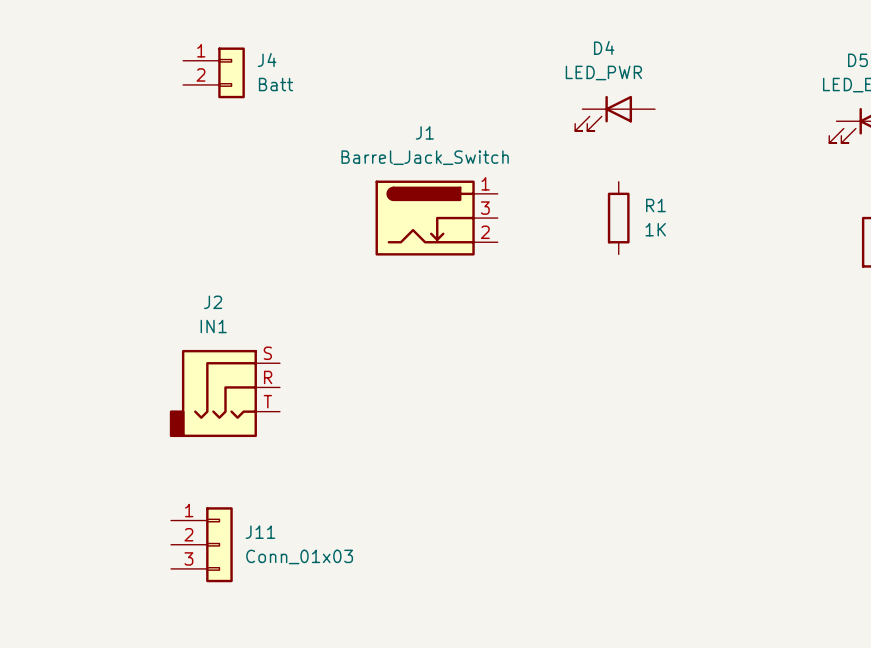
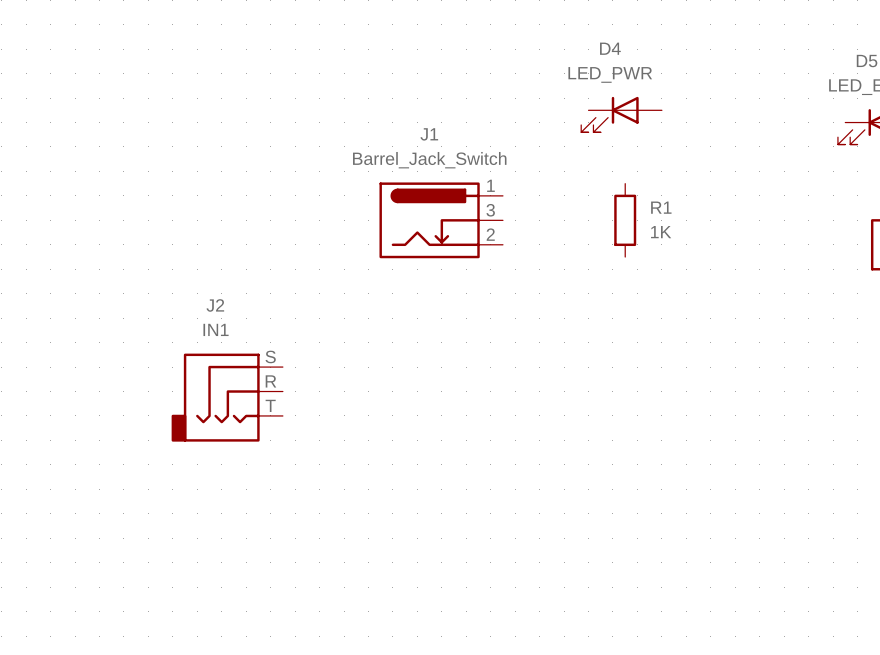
J4: Batt (214, 72) -> none
J11: Conn_01x03 (201, 544) -> none

